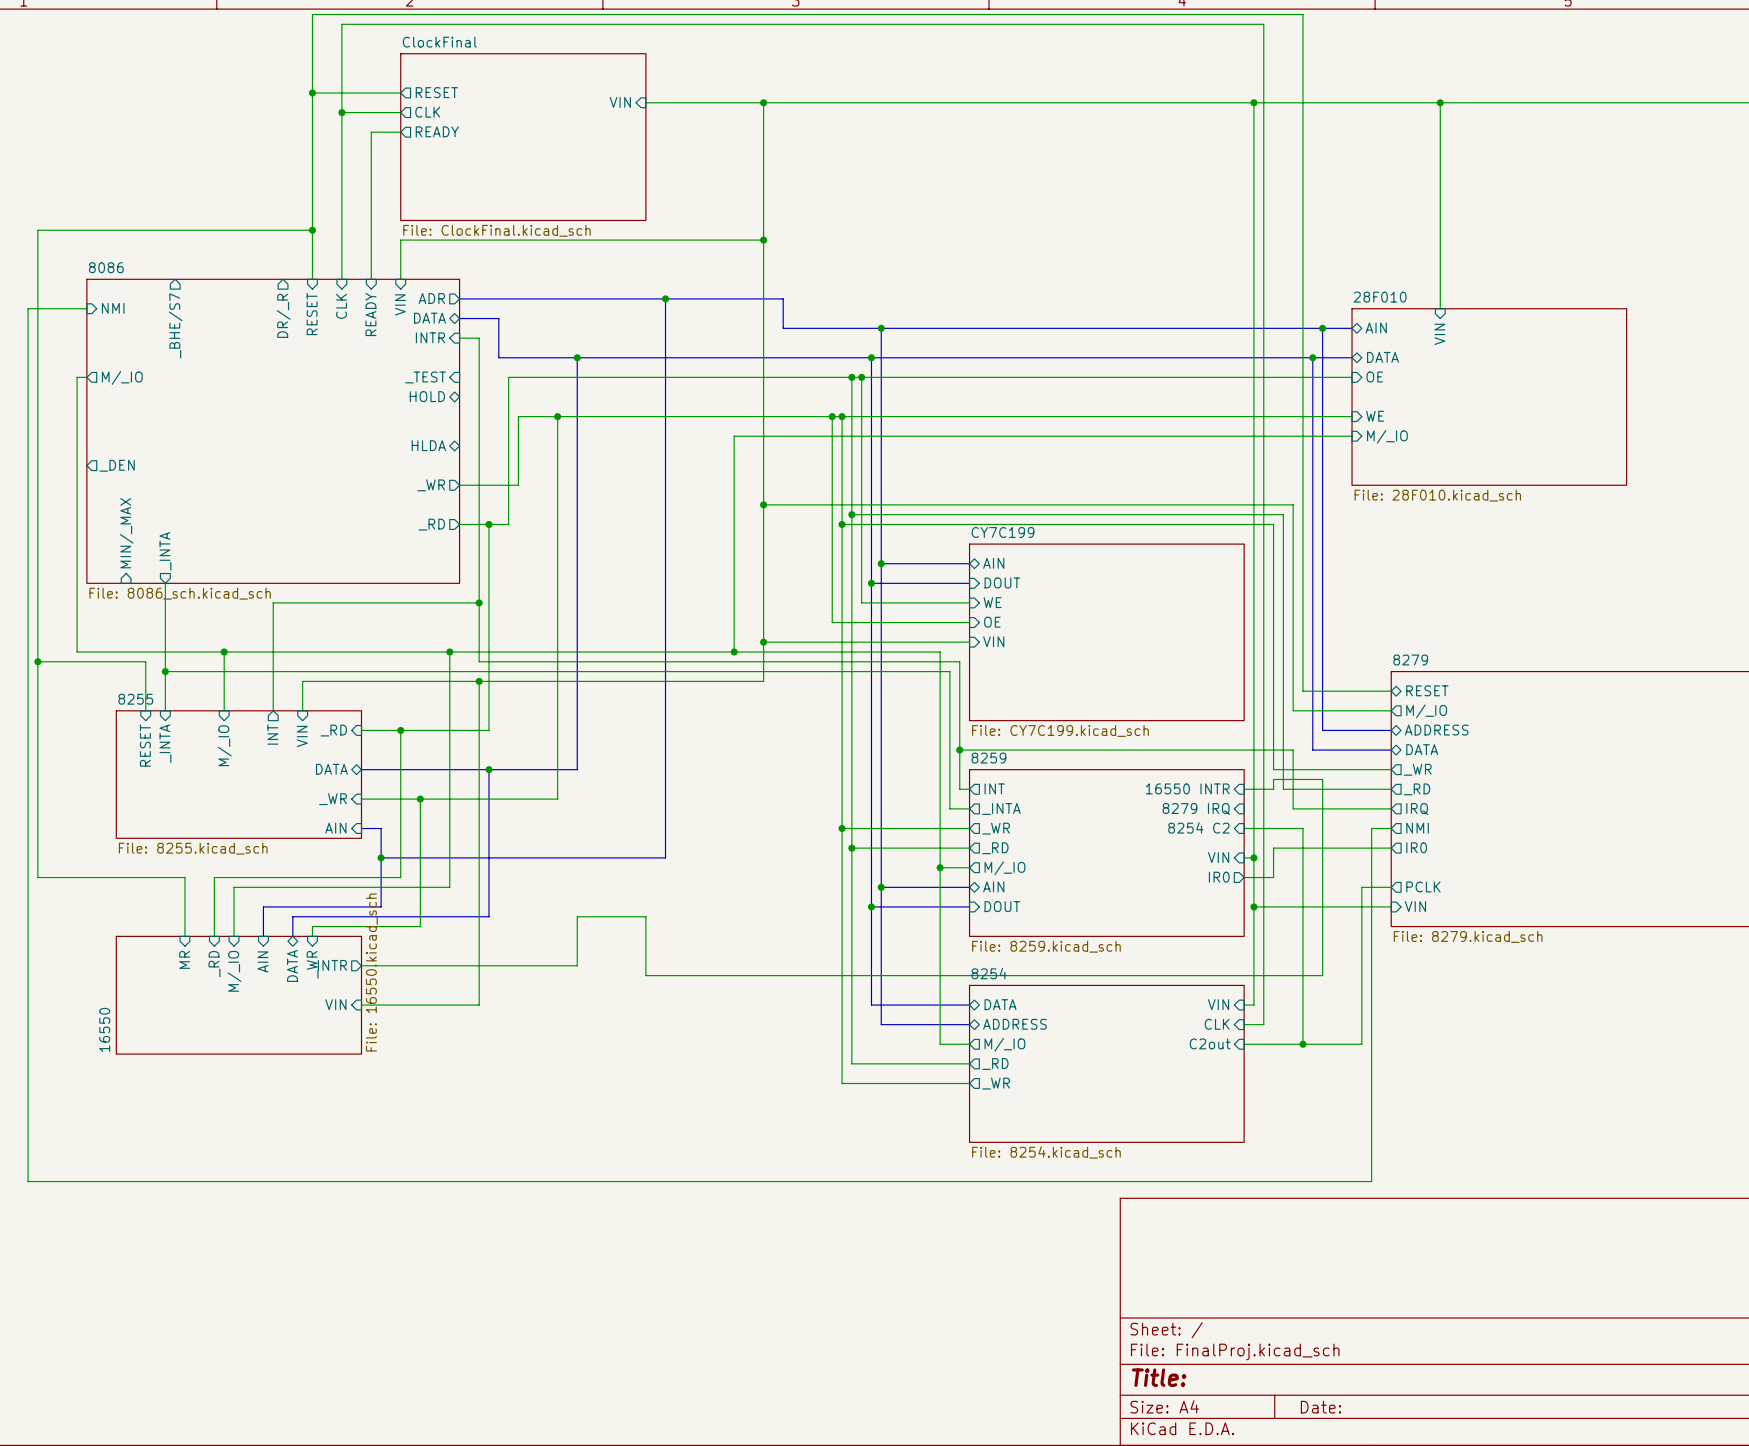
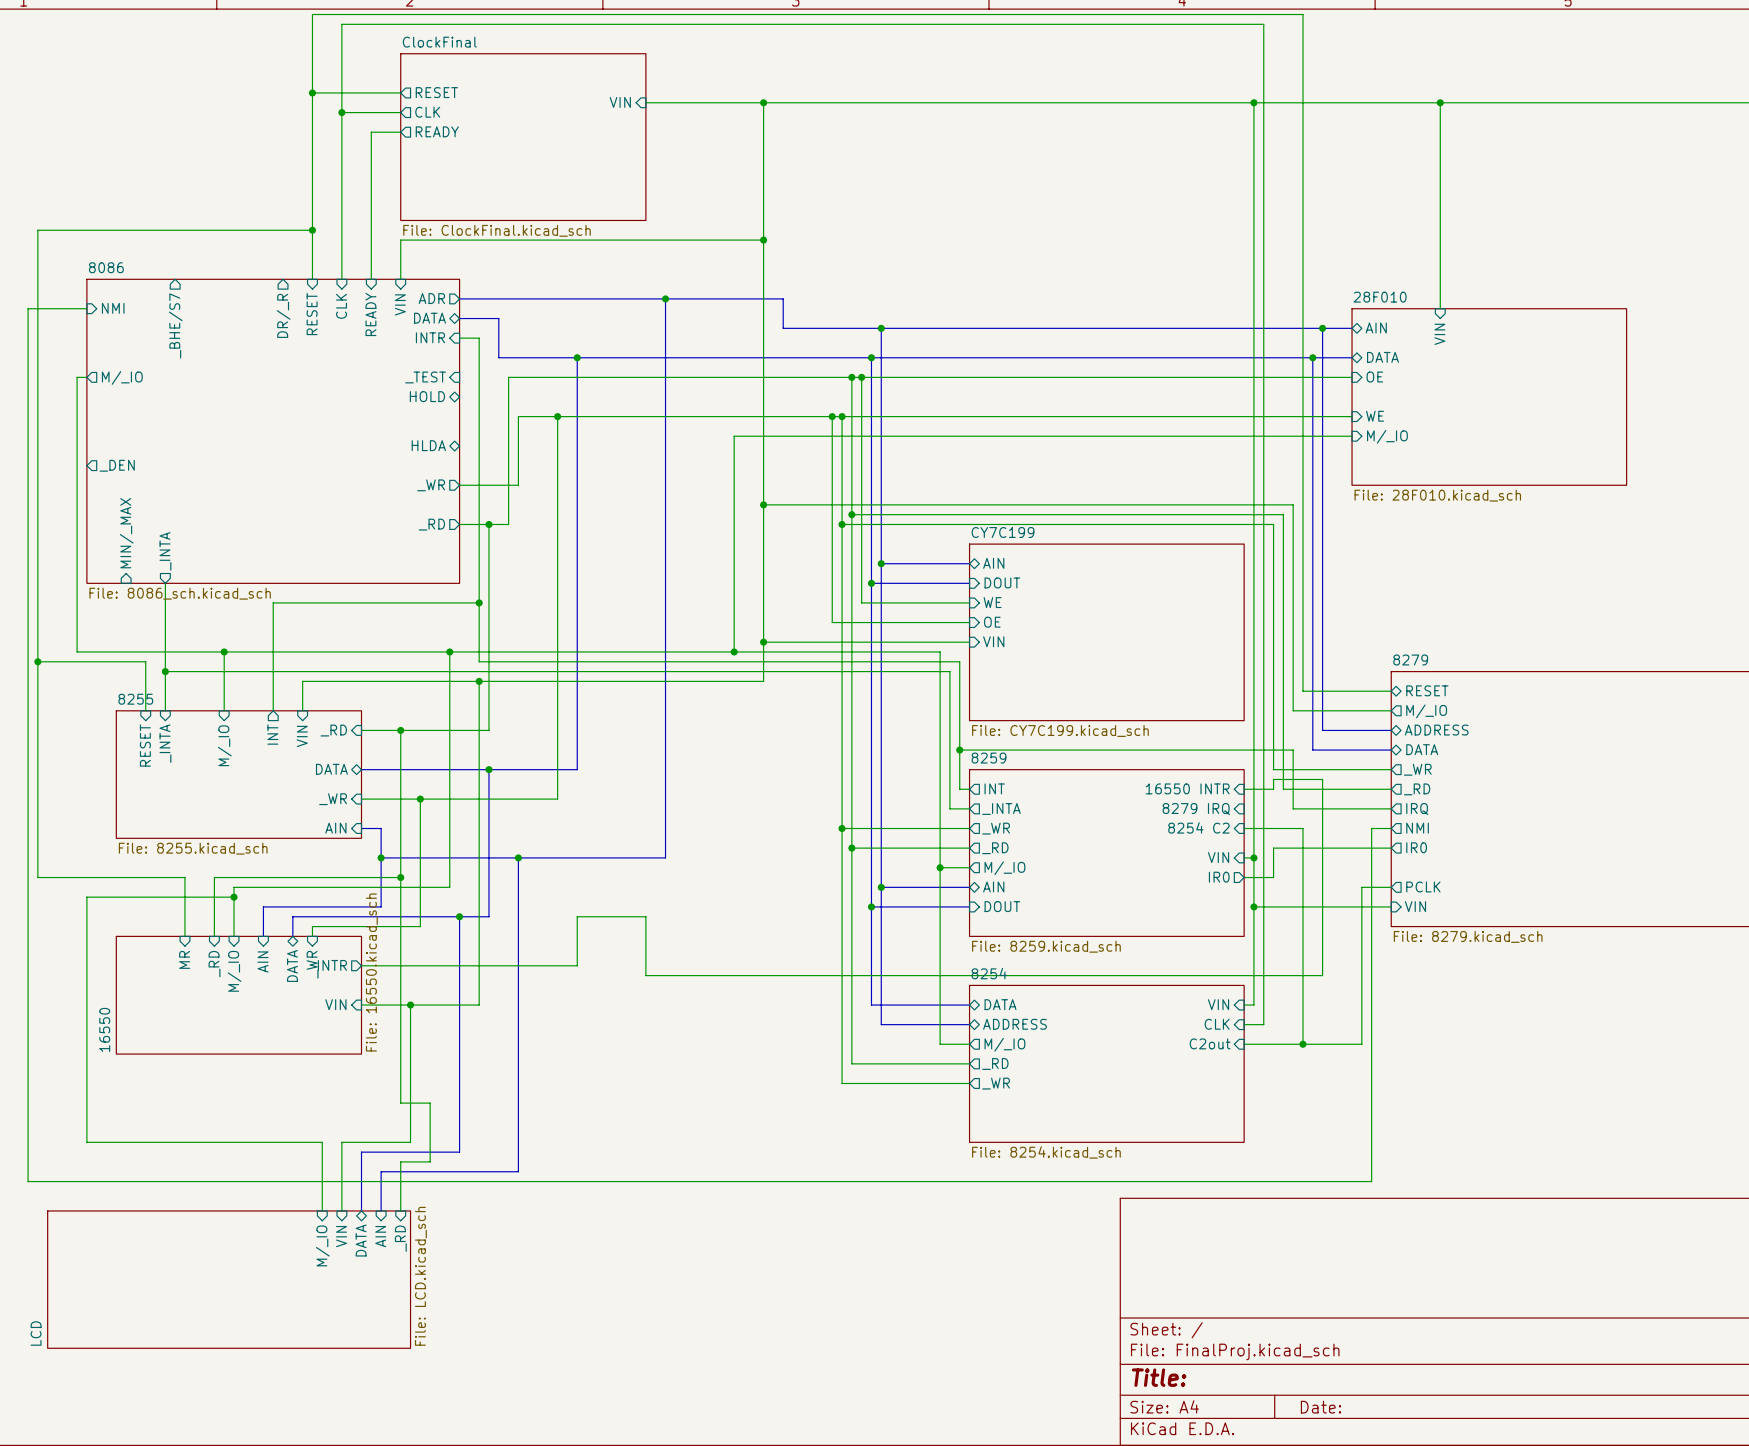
bus: none -> (518, 857) (518, 1171) (381, 1171) (381, 1210)
junction: none -> (518, 857)
wire: none -> (400, 877) (400, 1103) (430, 1103) (430, 1161) (400, 1161) (400, 1210)
junction: none -> (400, 877)
wire: none -> (234, 897) (86, 897) (86, 1142) (322, 1142) (322, 1210)
junction: none -> (234, 897)
bus: none -> (459, 916) (459, 1152) (361, 1152) (361, 1210)
junction: none -> (459, 916)
wire: none -> (410, 1005) (410, 1142) (341, 1142) (341, 1210)
junction: none -> (410, 1005)
sheet pin: none -> VIN (341, 1236)
sheet pin: none -> AIN (380, 1236)
sheet pin: none -> _RD (400, 1238)
sheet pin: none -> DATA (361, 1240)
sheet pin: none -> M/_IO (322, 1245)
sheet LCD: none -> File: LCD.kicad_sch (229, 1279)

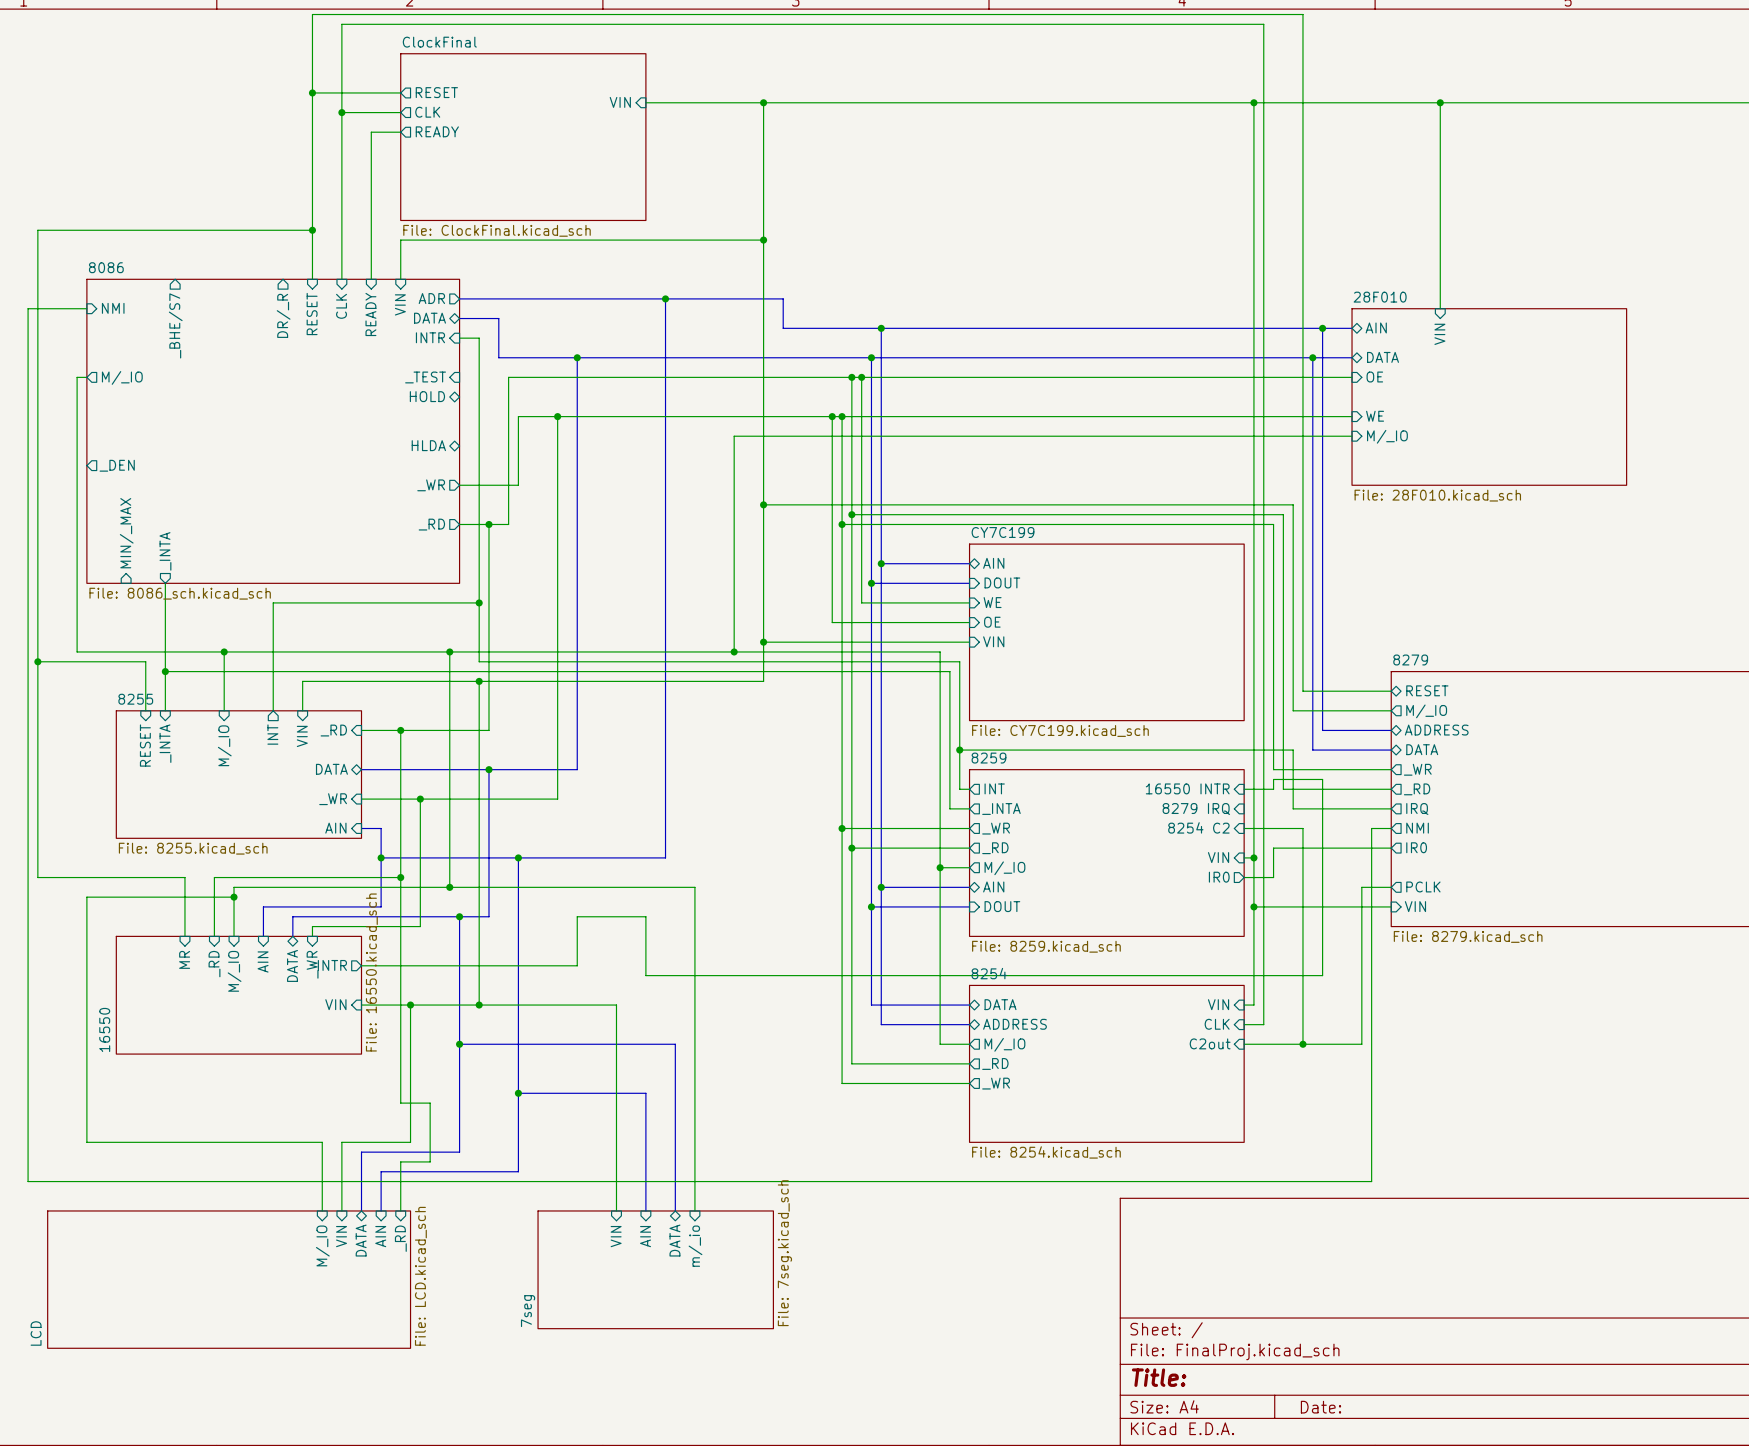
wire: none -> (449, 887) (694, 887) (694, 1210)
junction: none -> (449, 887)
wire: none -> (479, 1005) (616, 1005) (616, 1210)
junction: none -> (479, 1005)
bus: none -> (459, 1044) (675, 1044) (675, 1210)
junction: none -> (459, 1044)
bus: none -> (518, 1093) (645, 1093) (645, 1210)
junction: none -> (518, 1093)
sheet pin: none -> VIN (616, 1236)
sheet pin: none -> AIN (645, 1236)
sheet pin: none -> DATA (674, 1240)
sheet pin: none -> m/_io (695, 1246)
sheet 7seg: none -> File: 7seg.kicad_sch (655, 1269)

